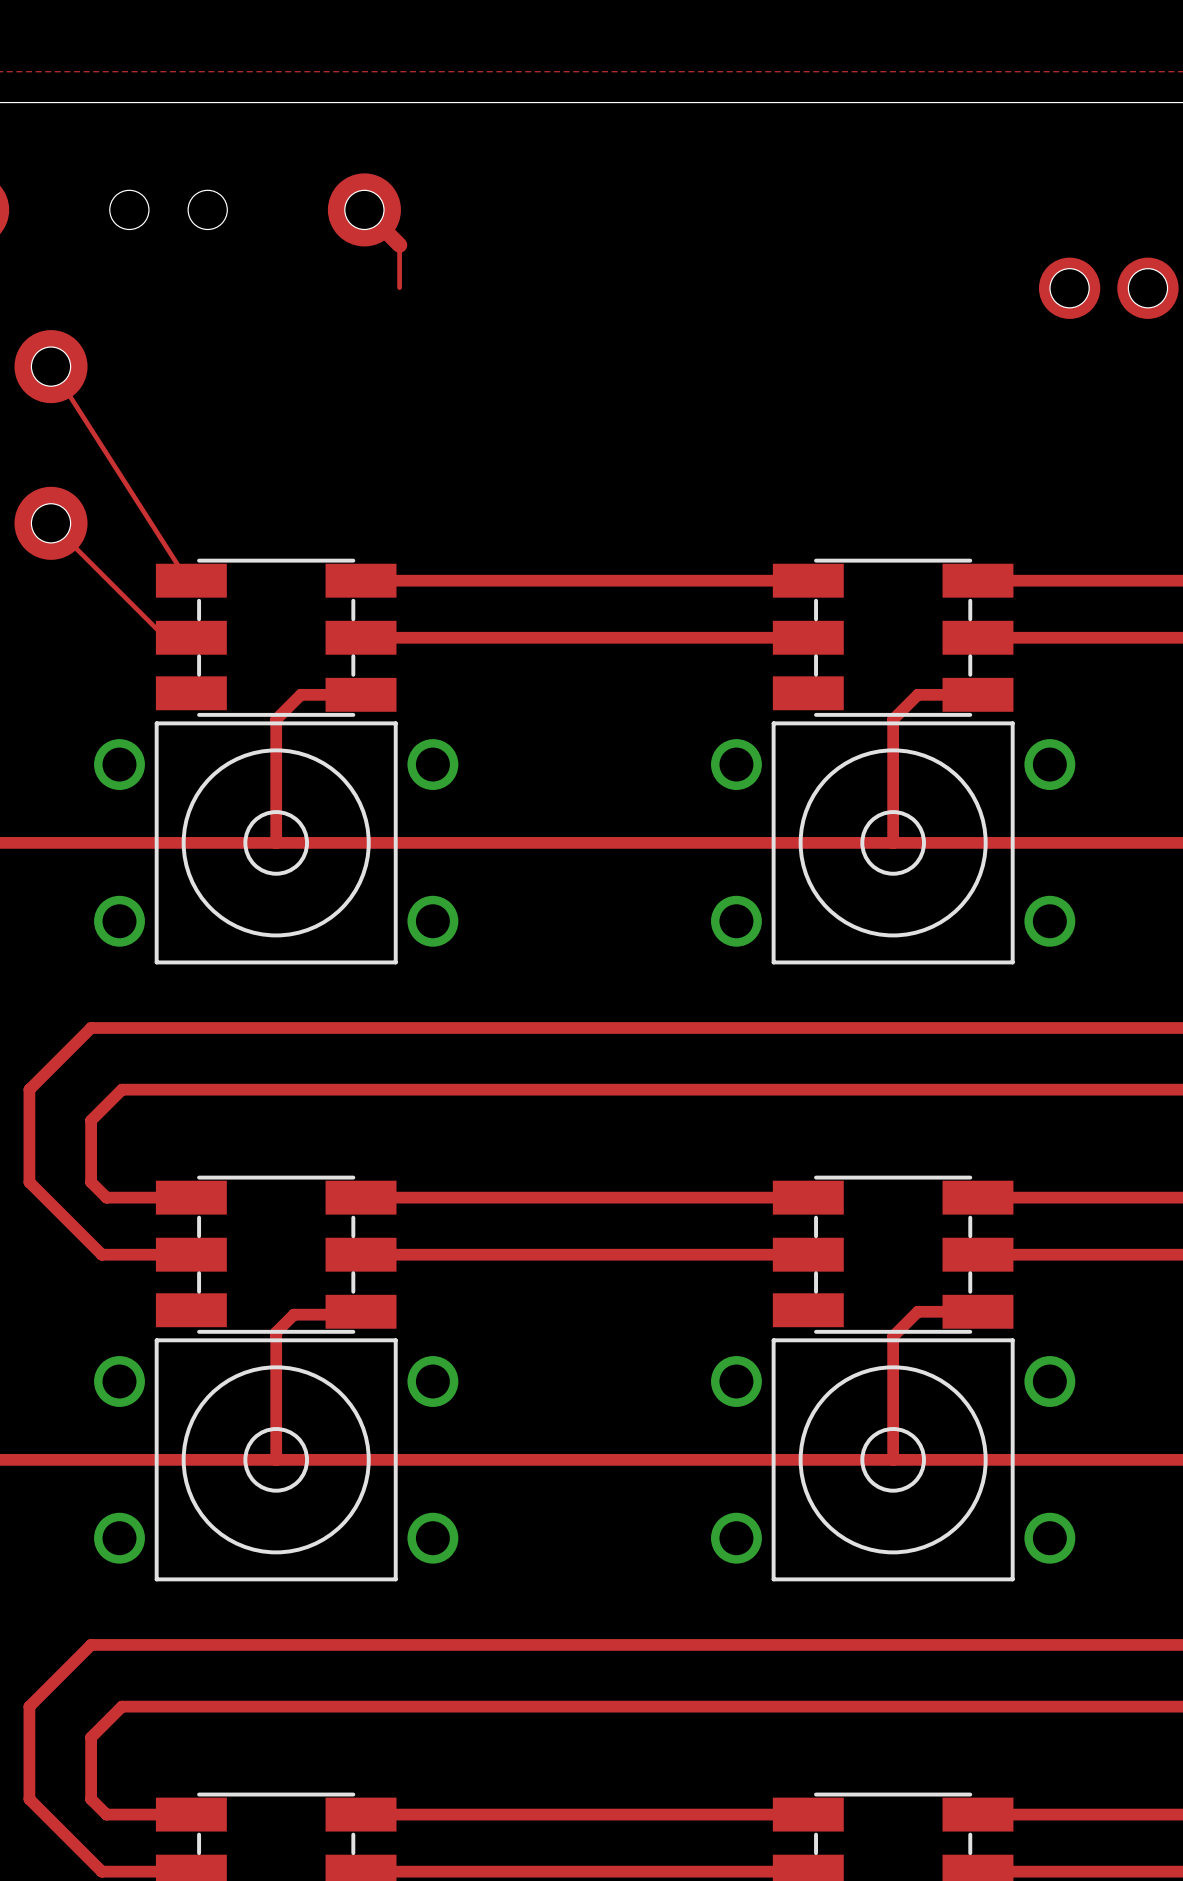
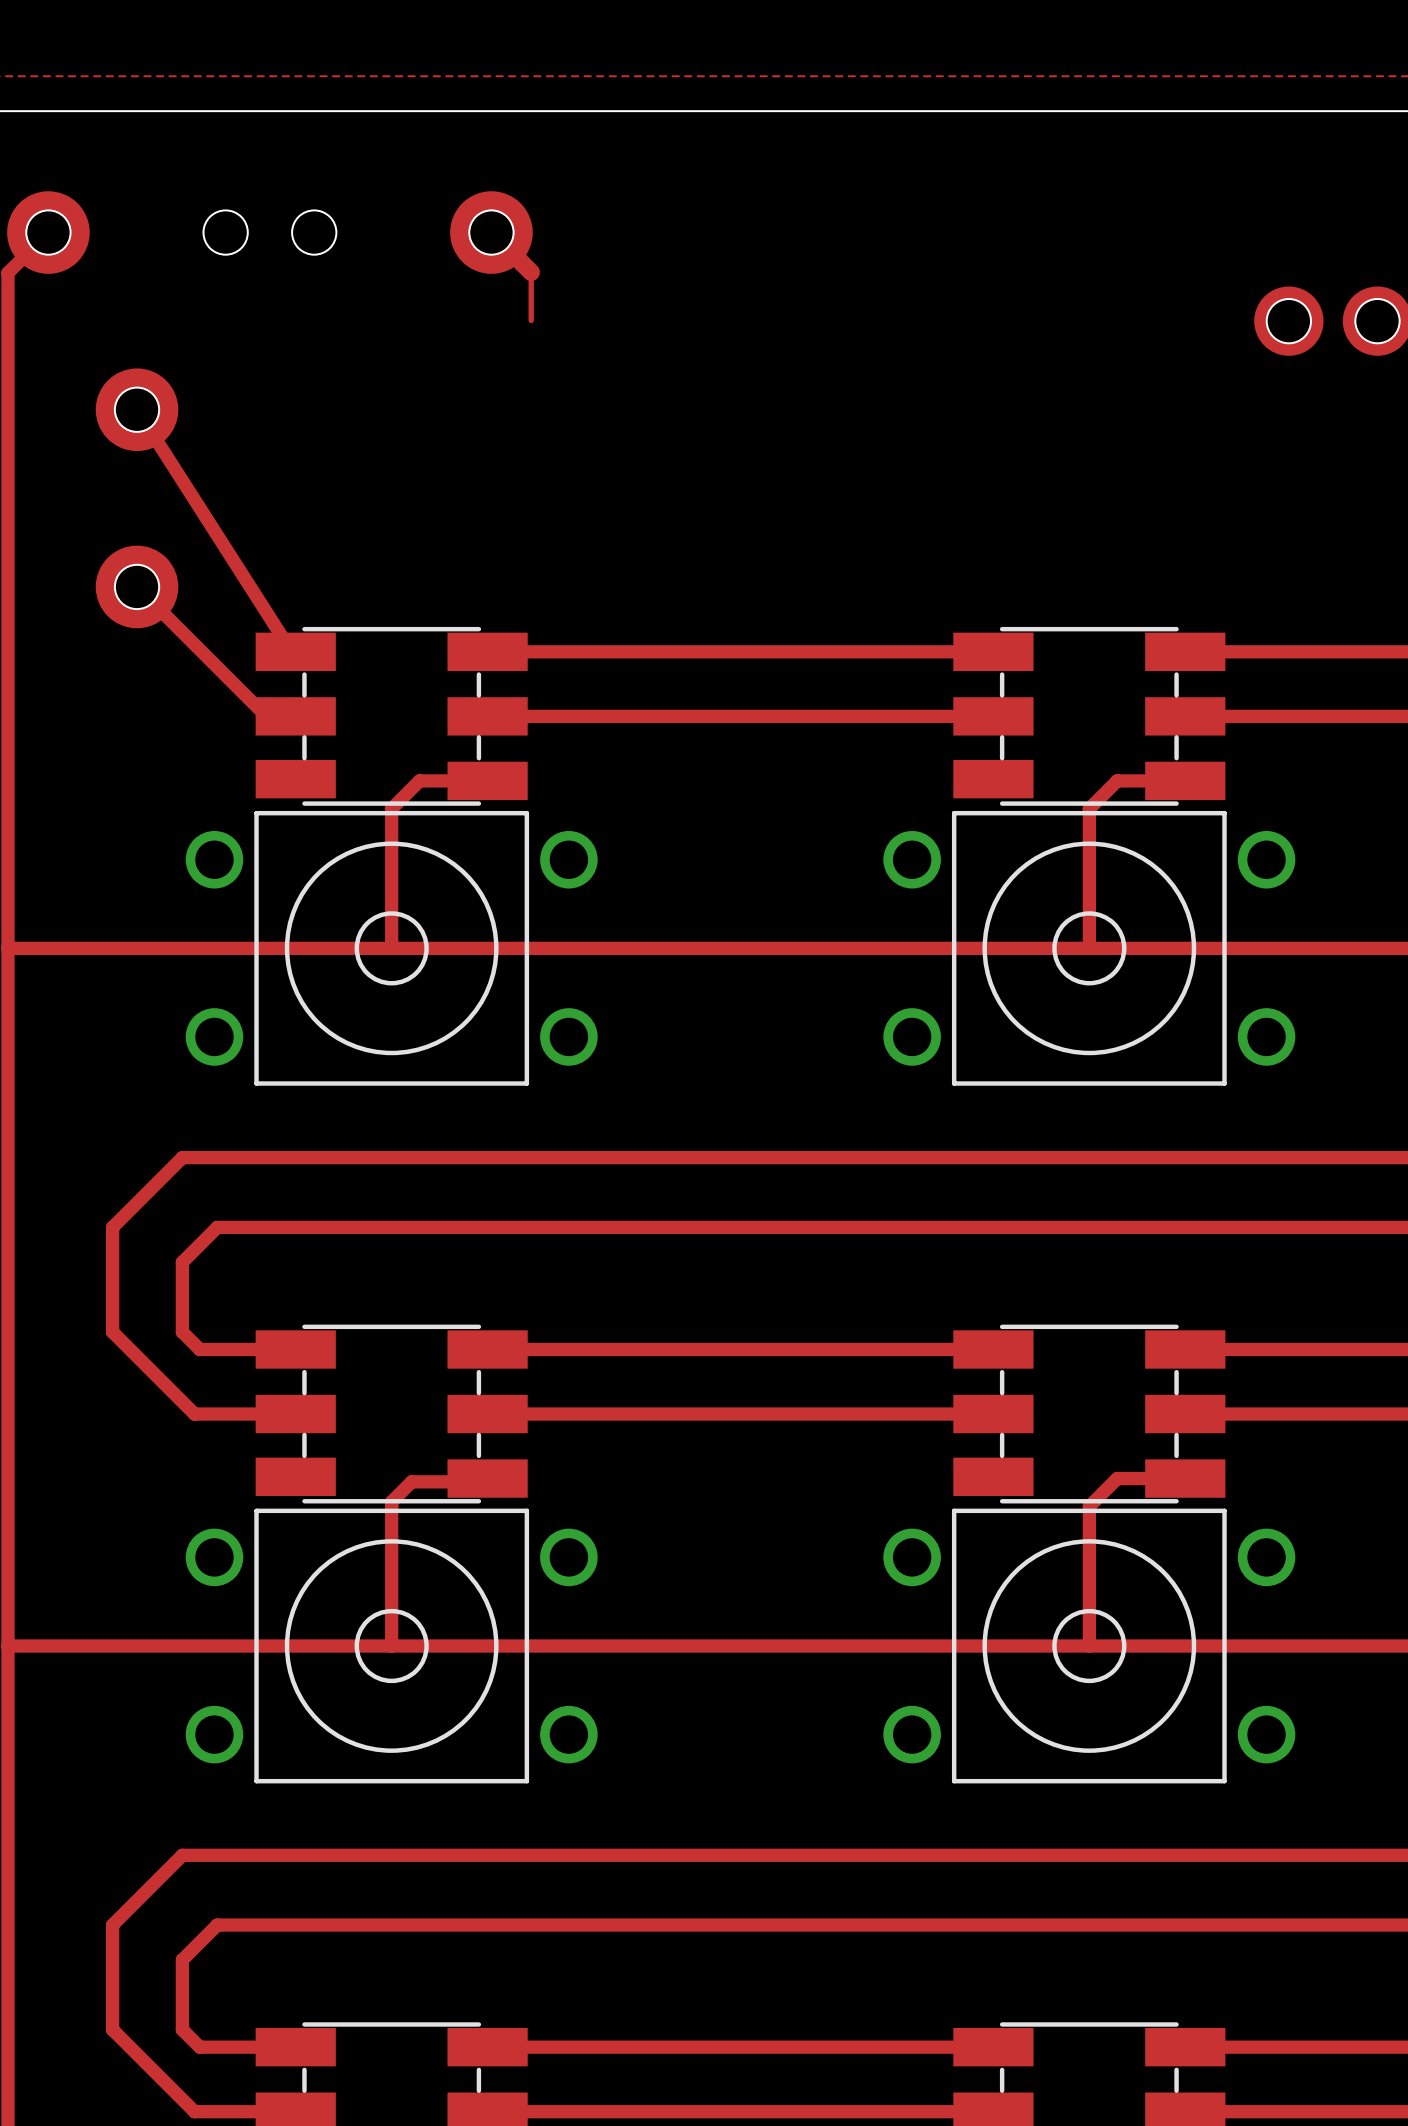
track width: thin (51, 366) (189, 583) -> thick (137, 409) (294, 655)
track width: thin (51, 523) (167, 639) -> thick (137, 586) (268, 718)

